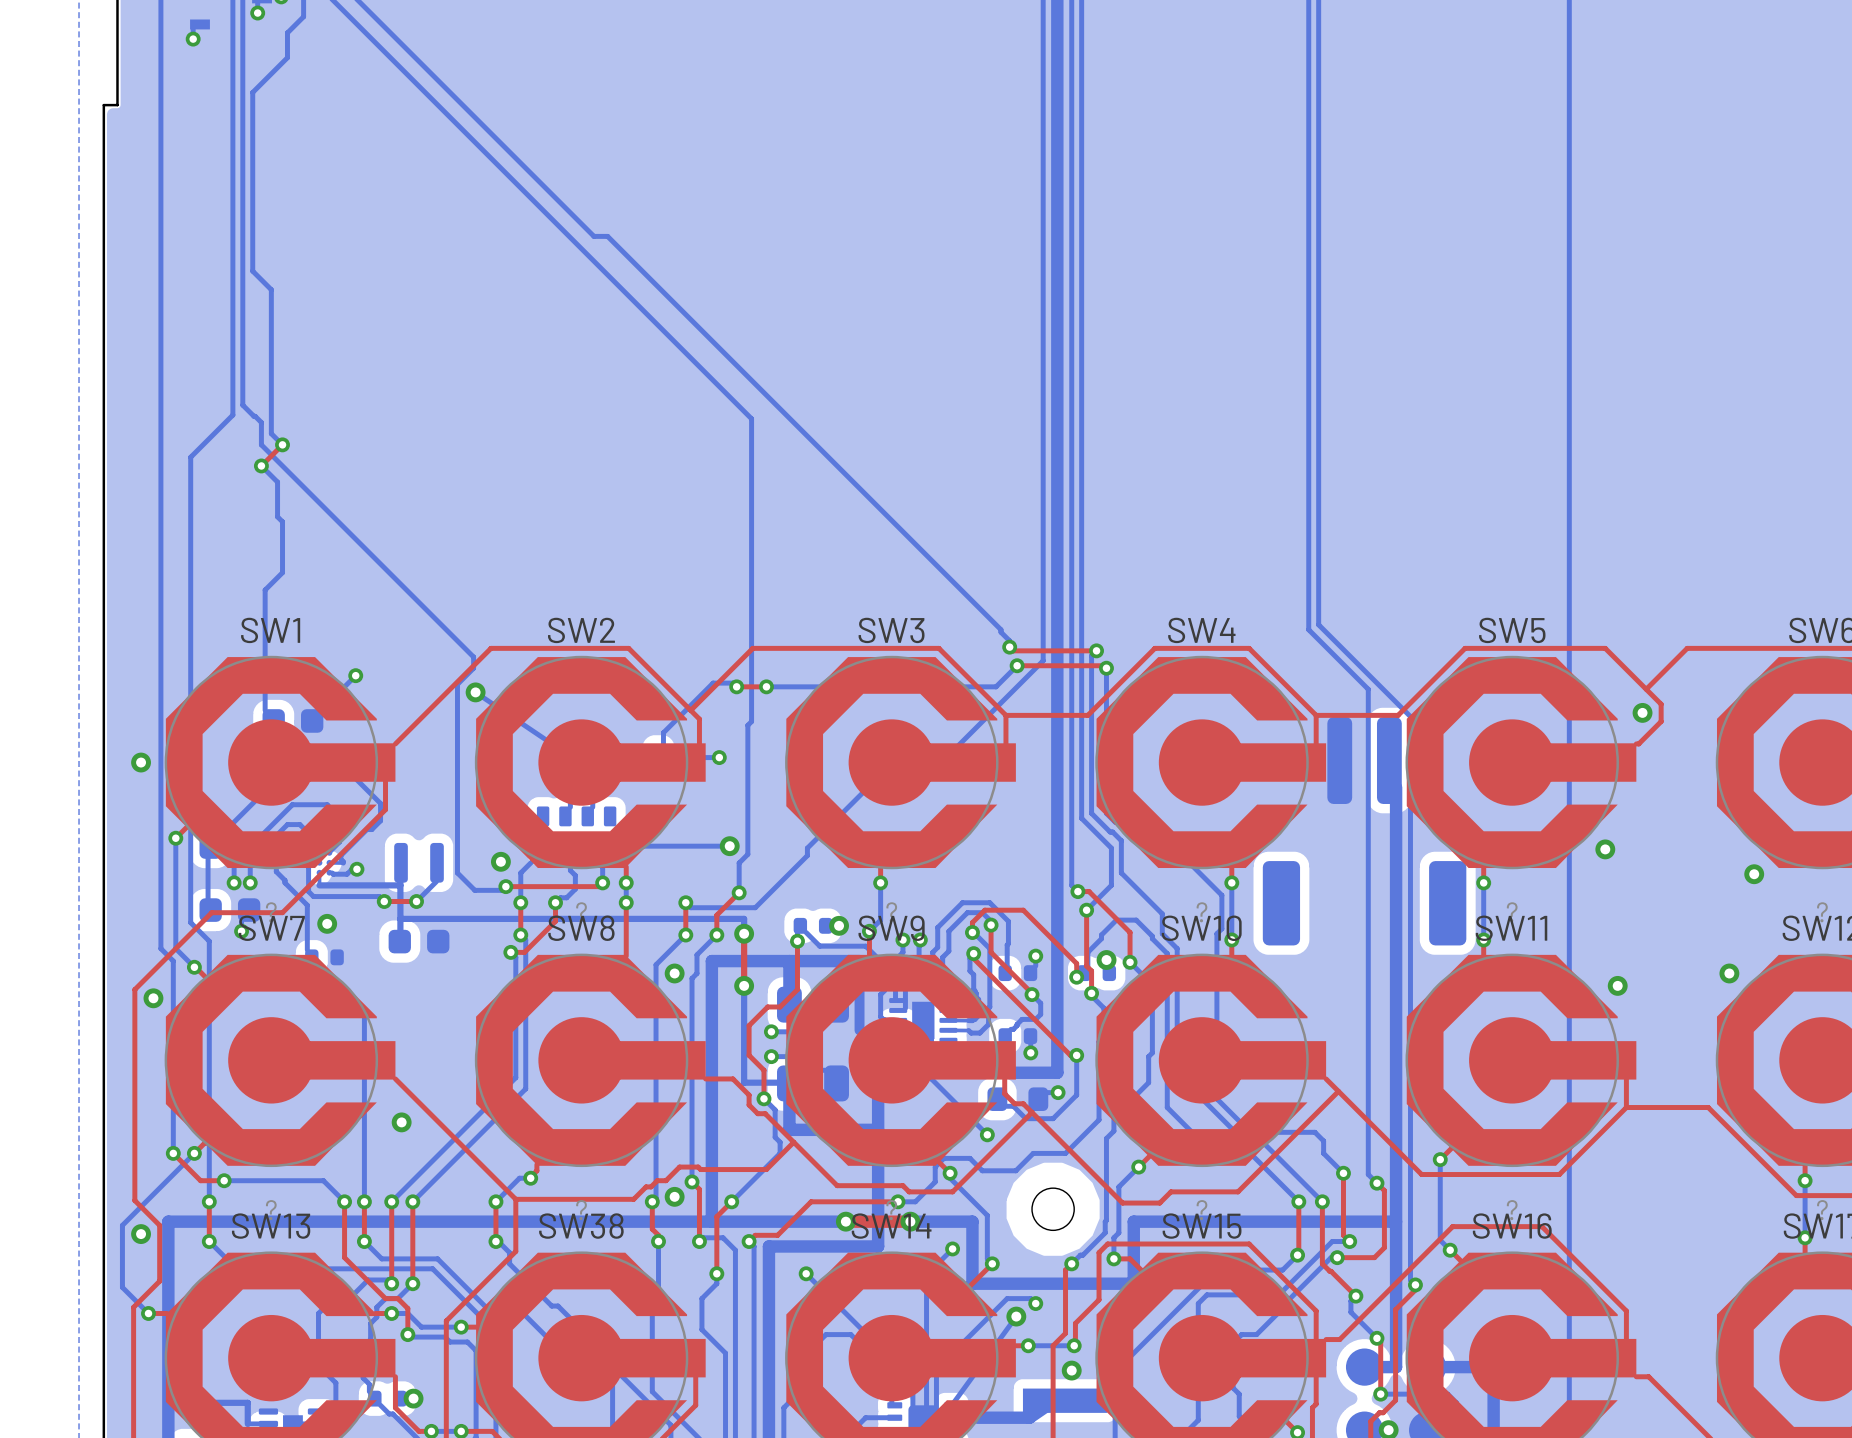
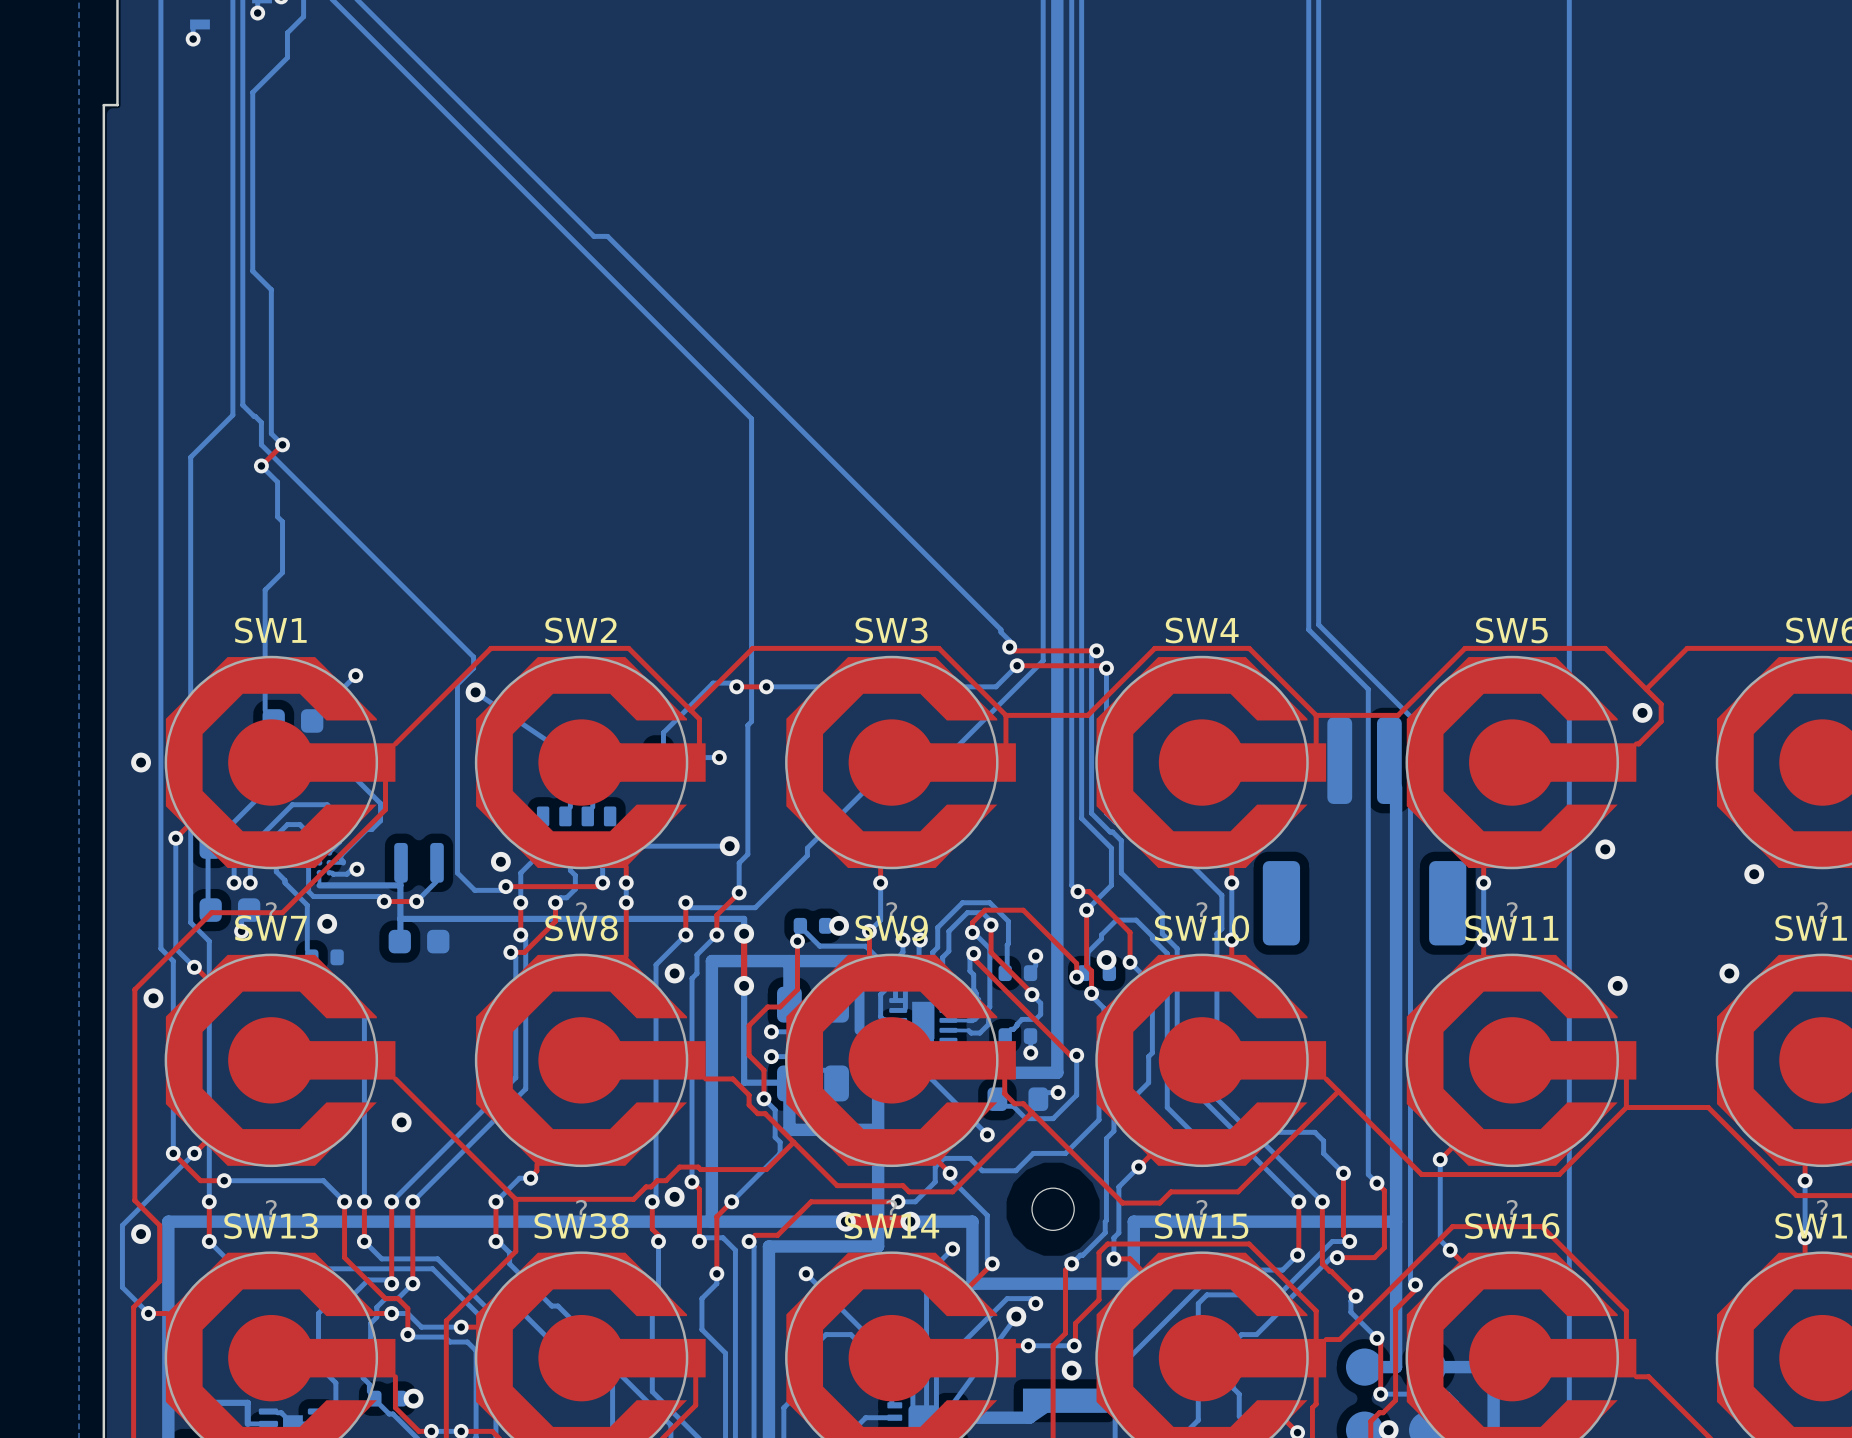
bottom track: none -> (277, 1412) (281, 1412) (285, 1416)

